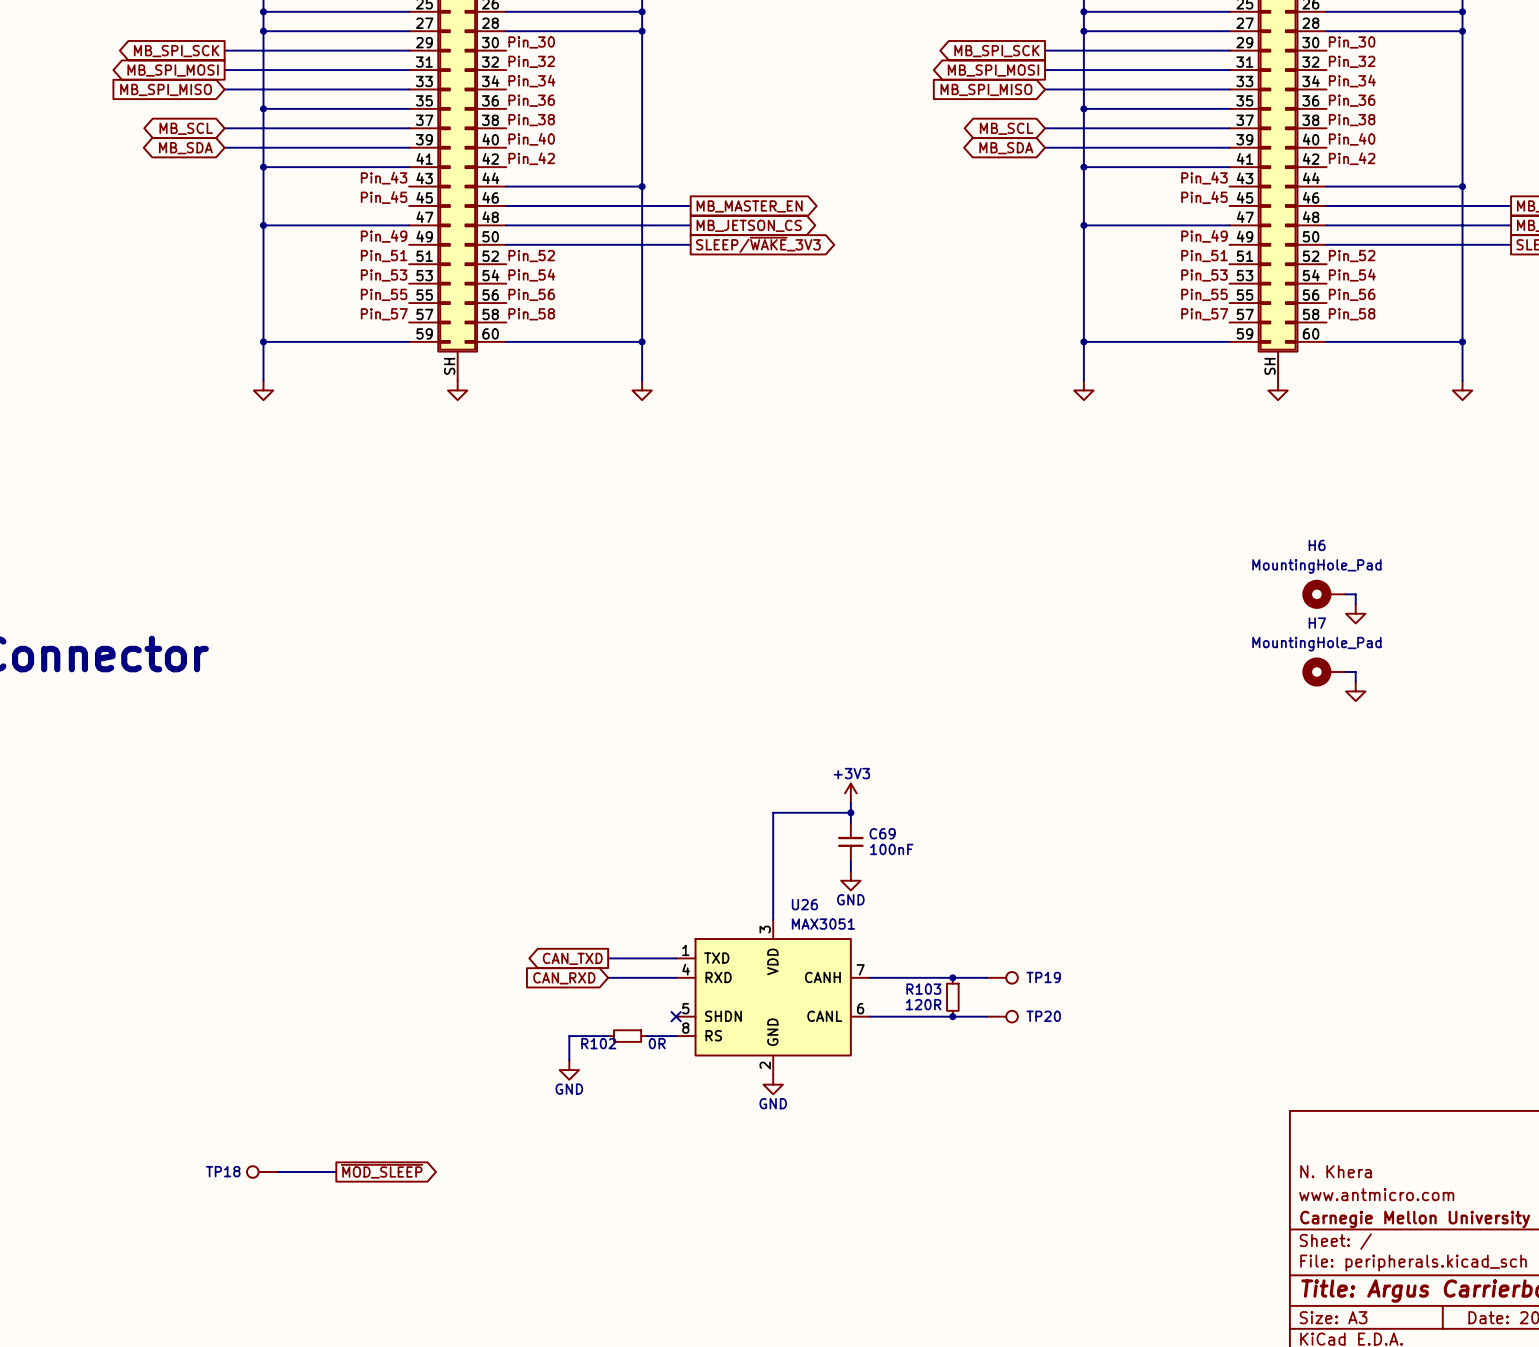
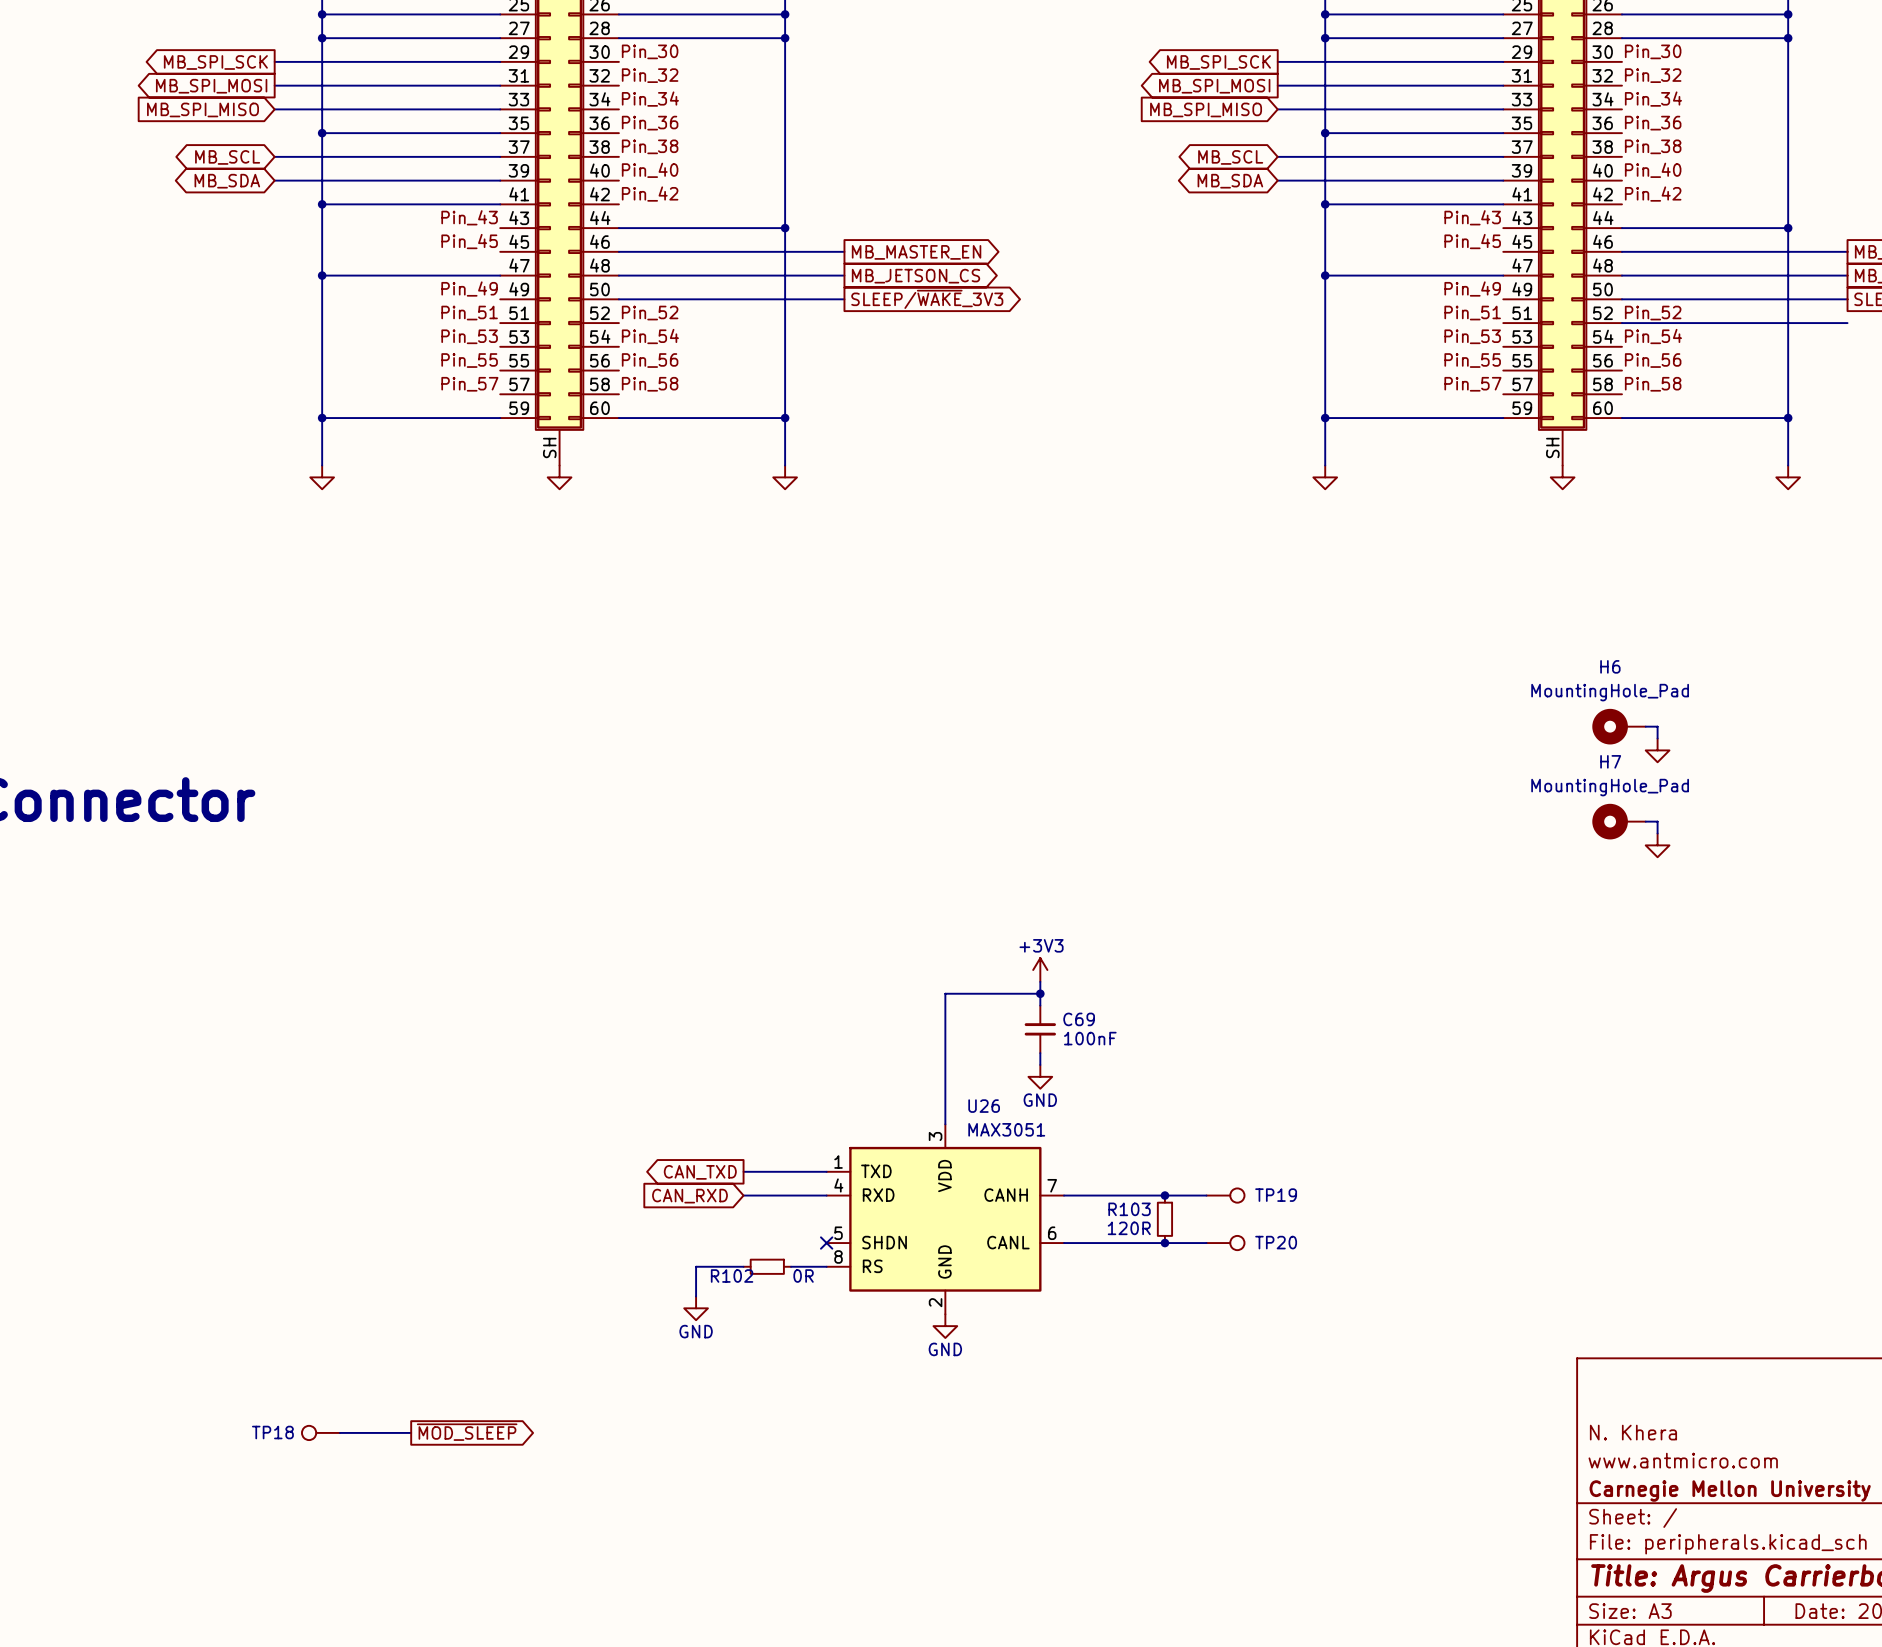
wire: none -> (1621, 323) (1847, 323)

